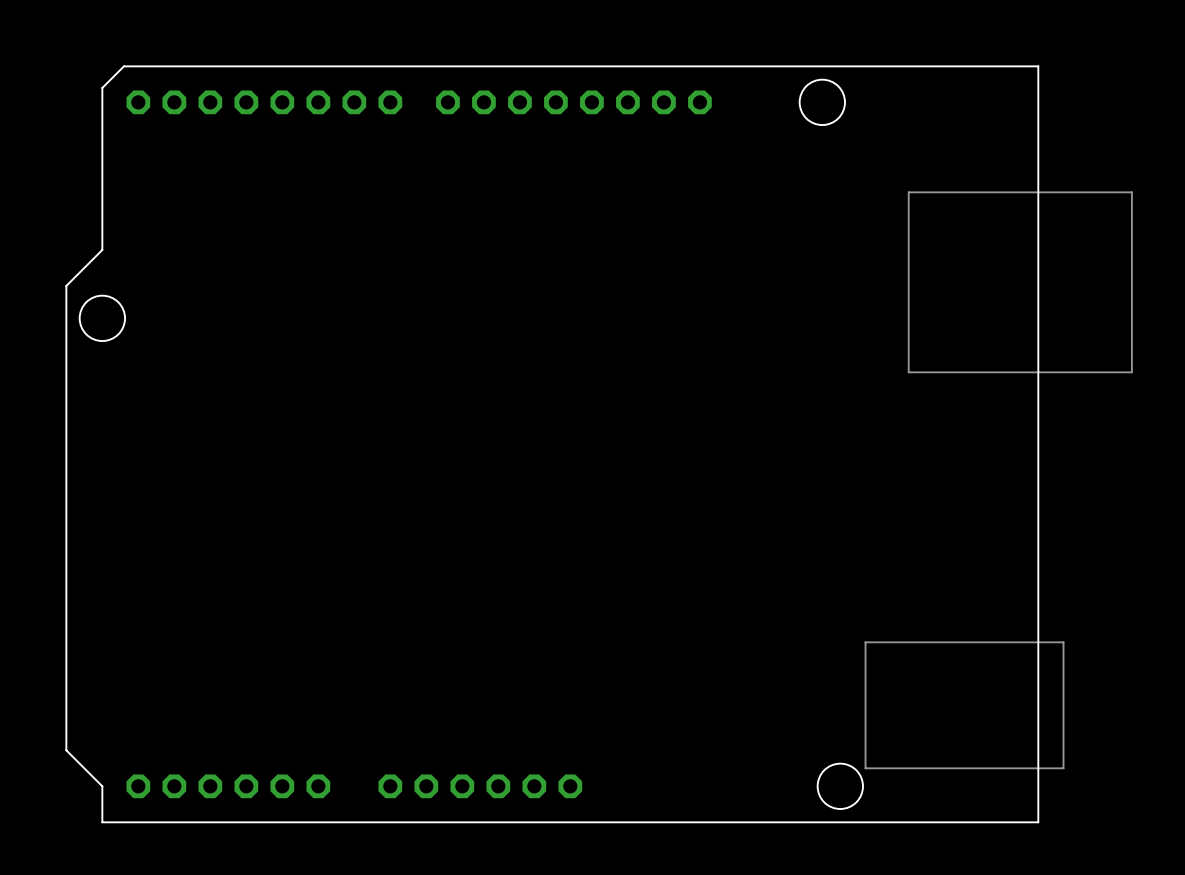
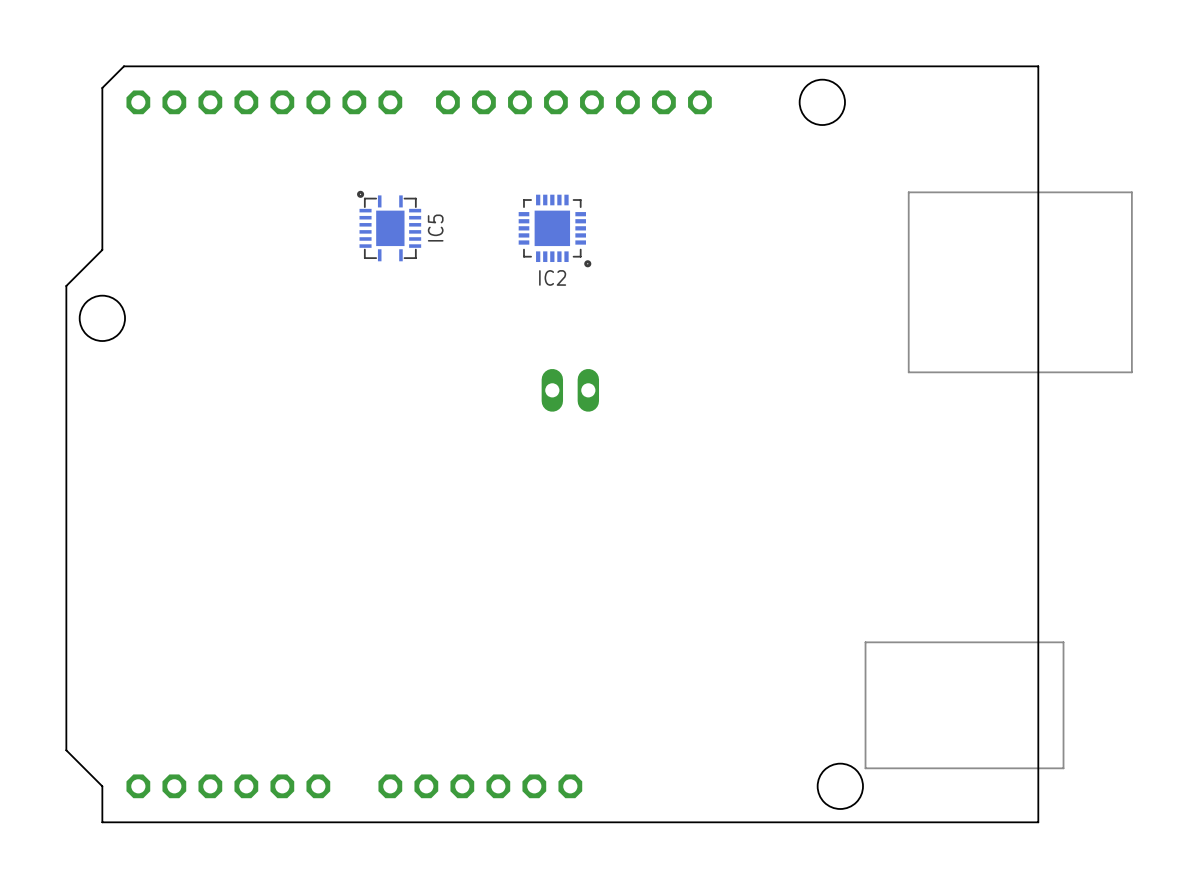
IC5: none -> (389, 226)
IC2: none -> (554, 231)
part: none -> (570, 390)

